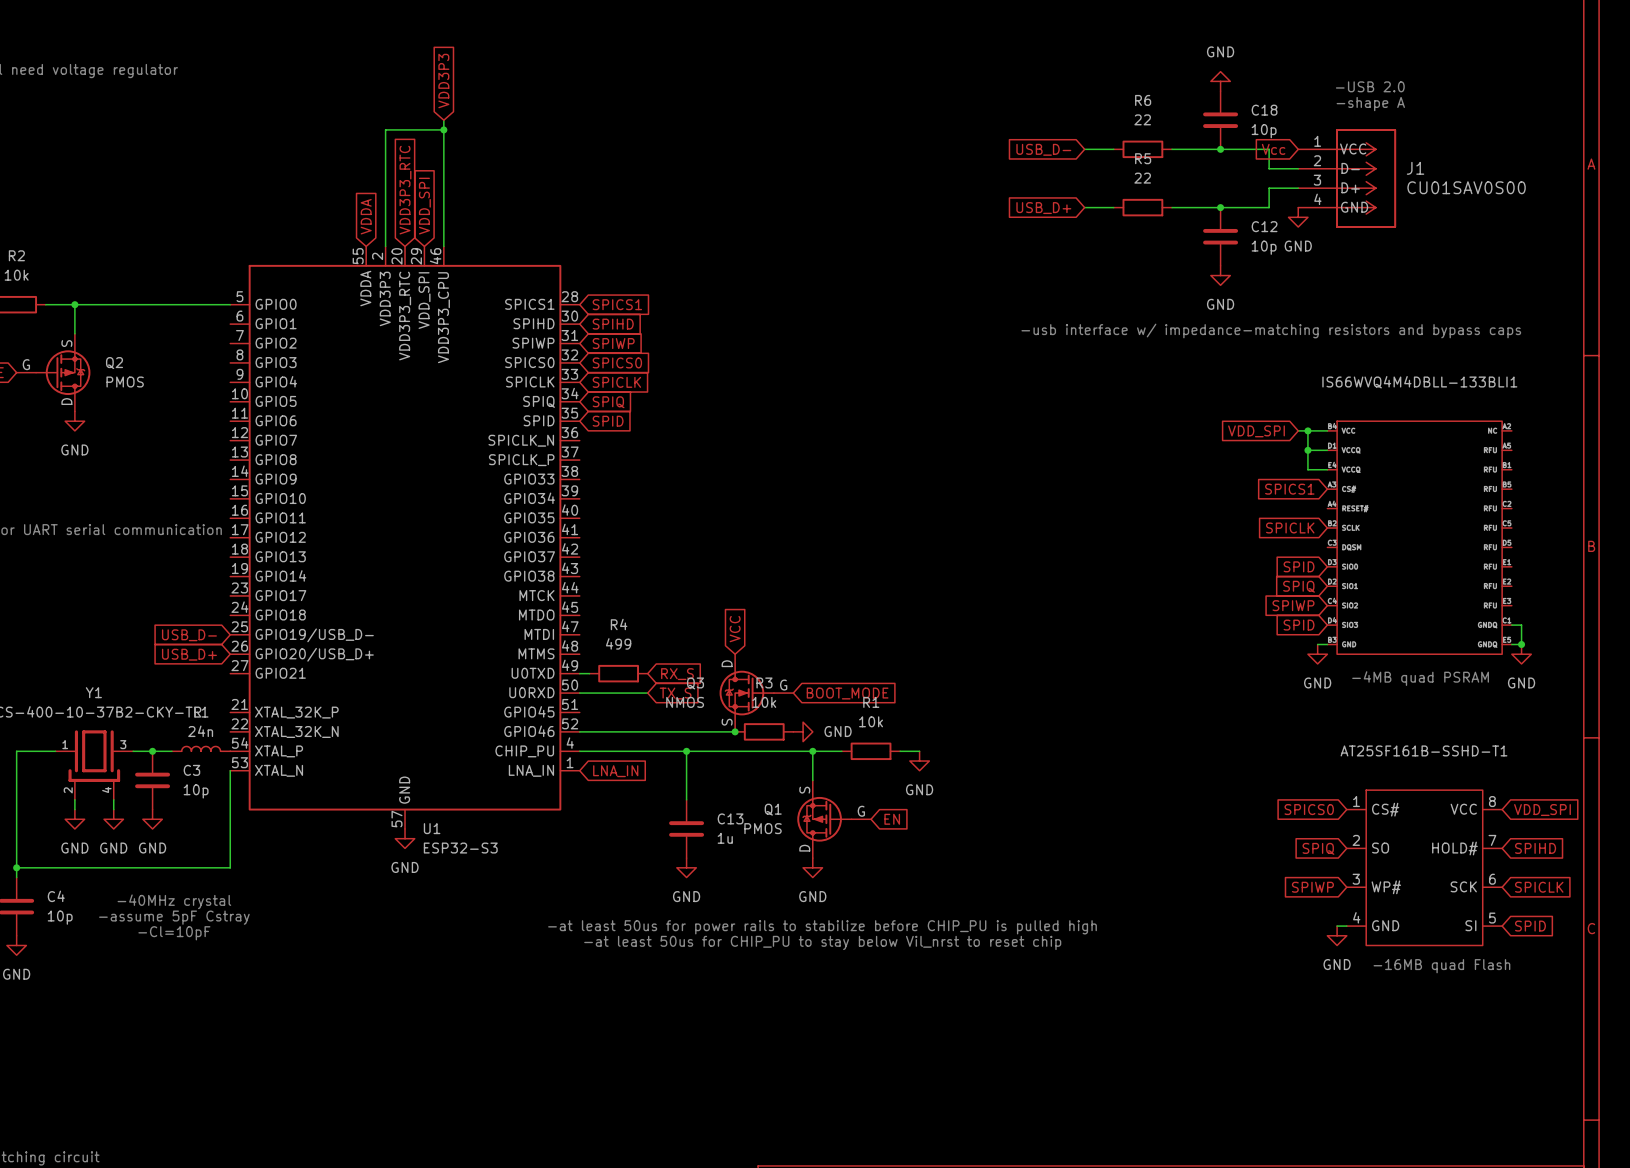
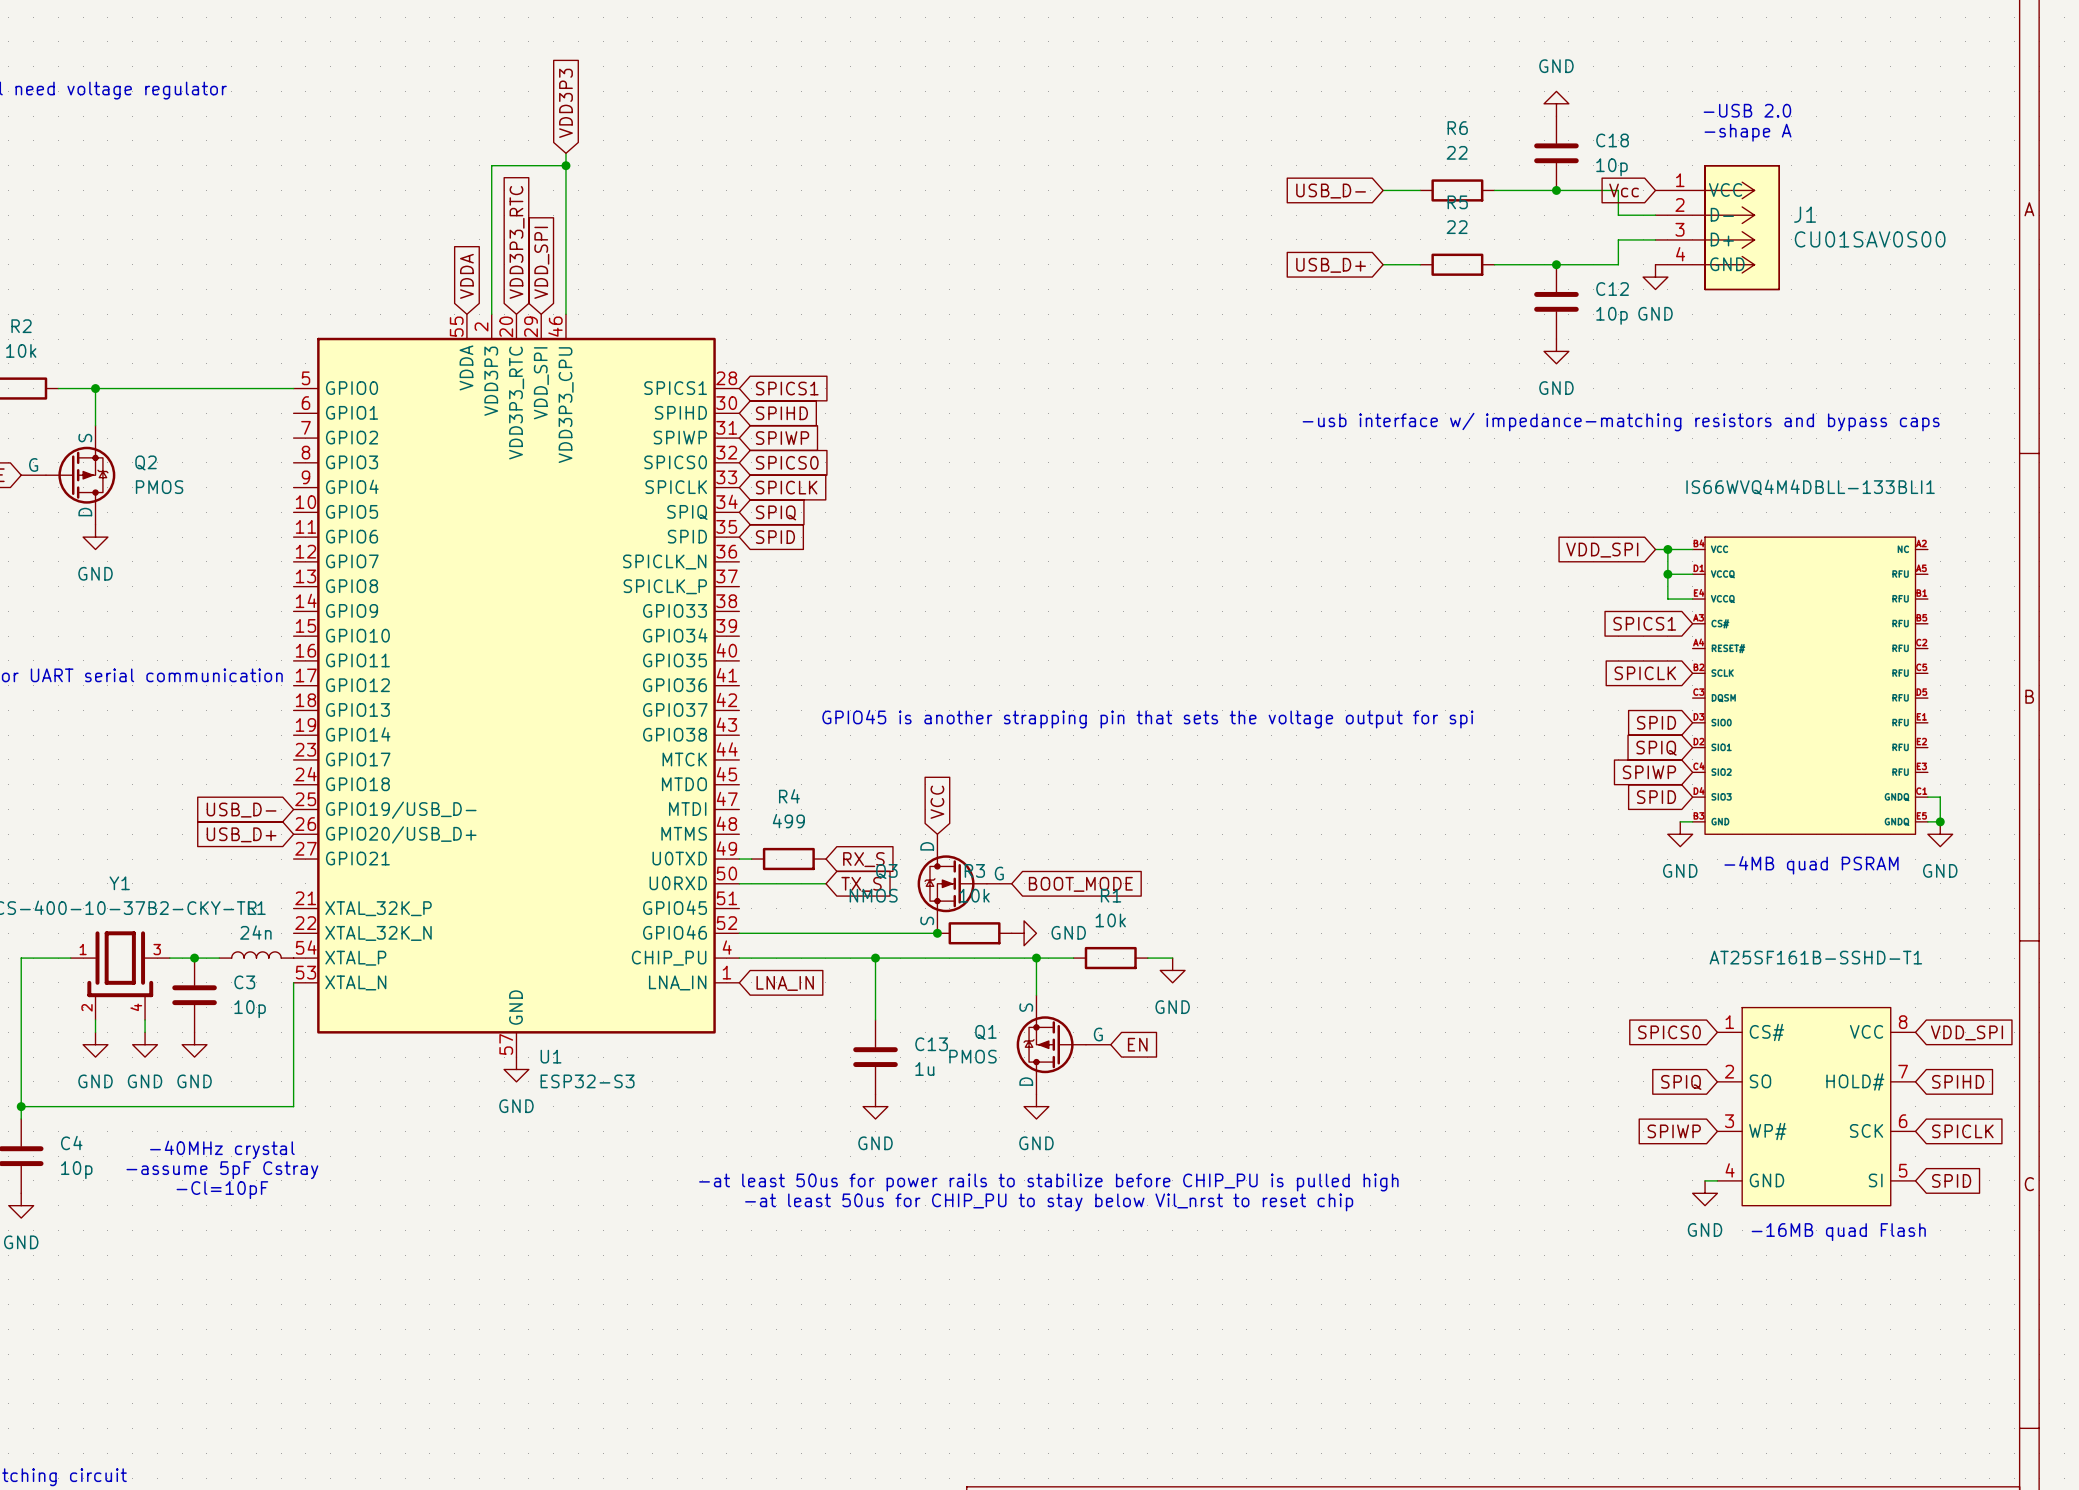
text: none -> GPIO45 is another strapping pin that sets the voltage output for spi (1147, 719)

